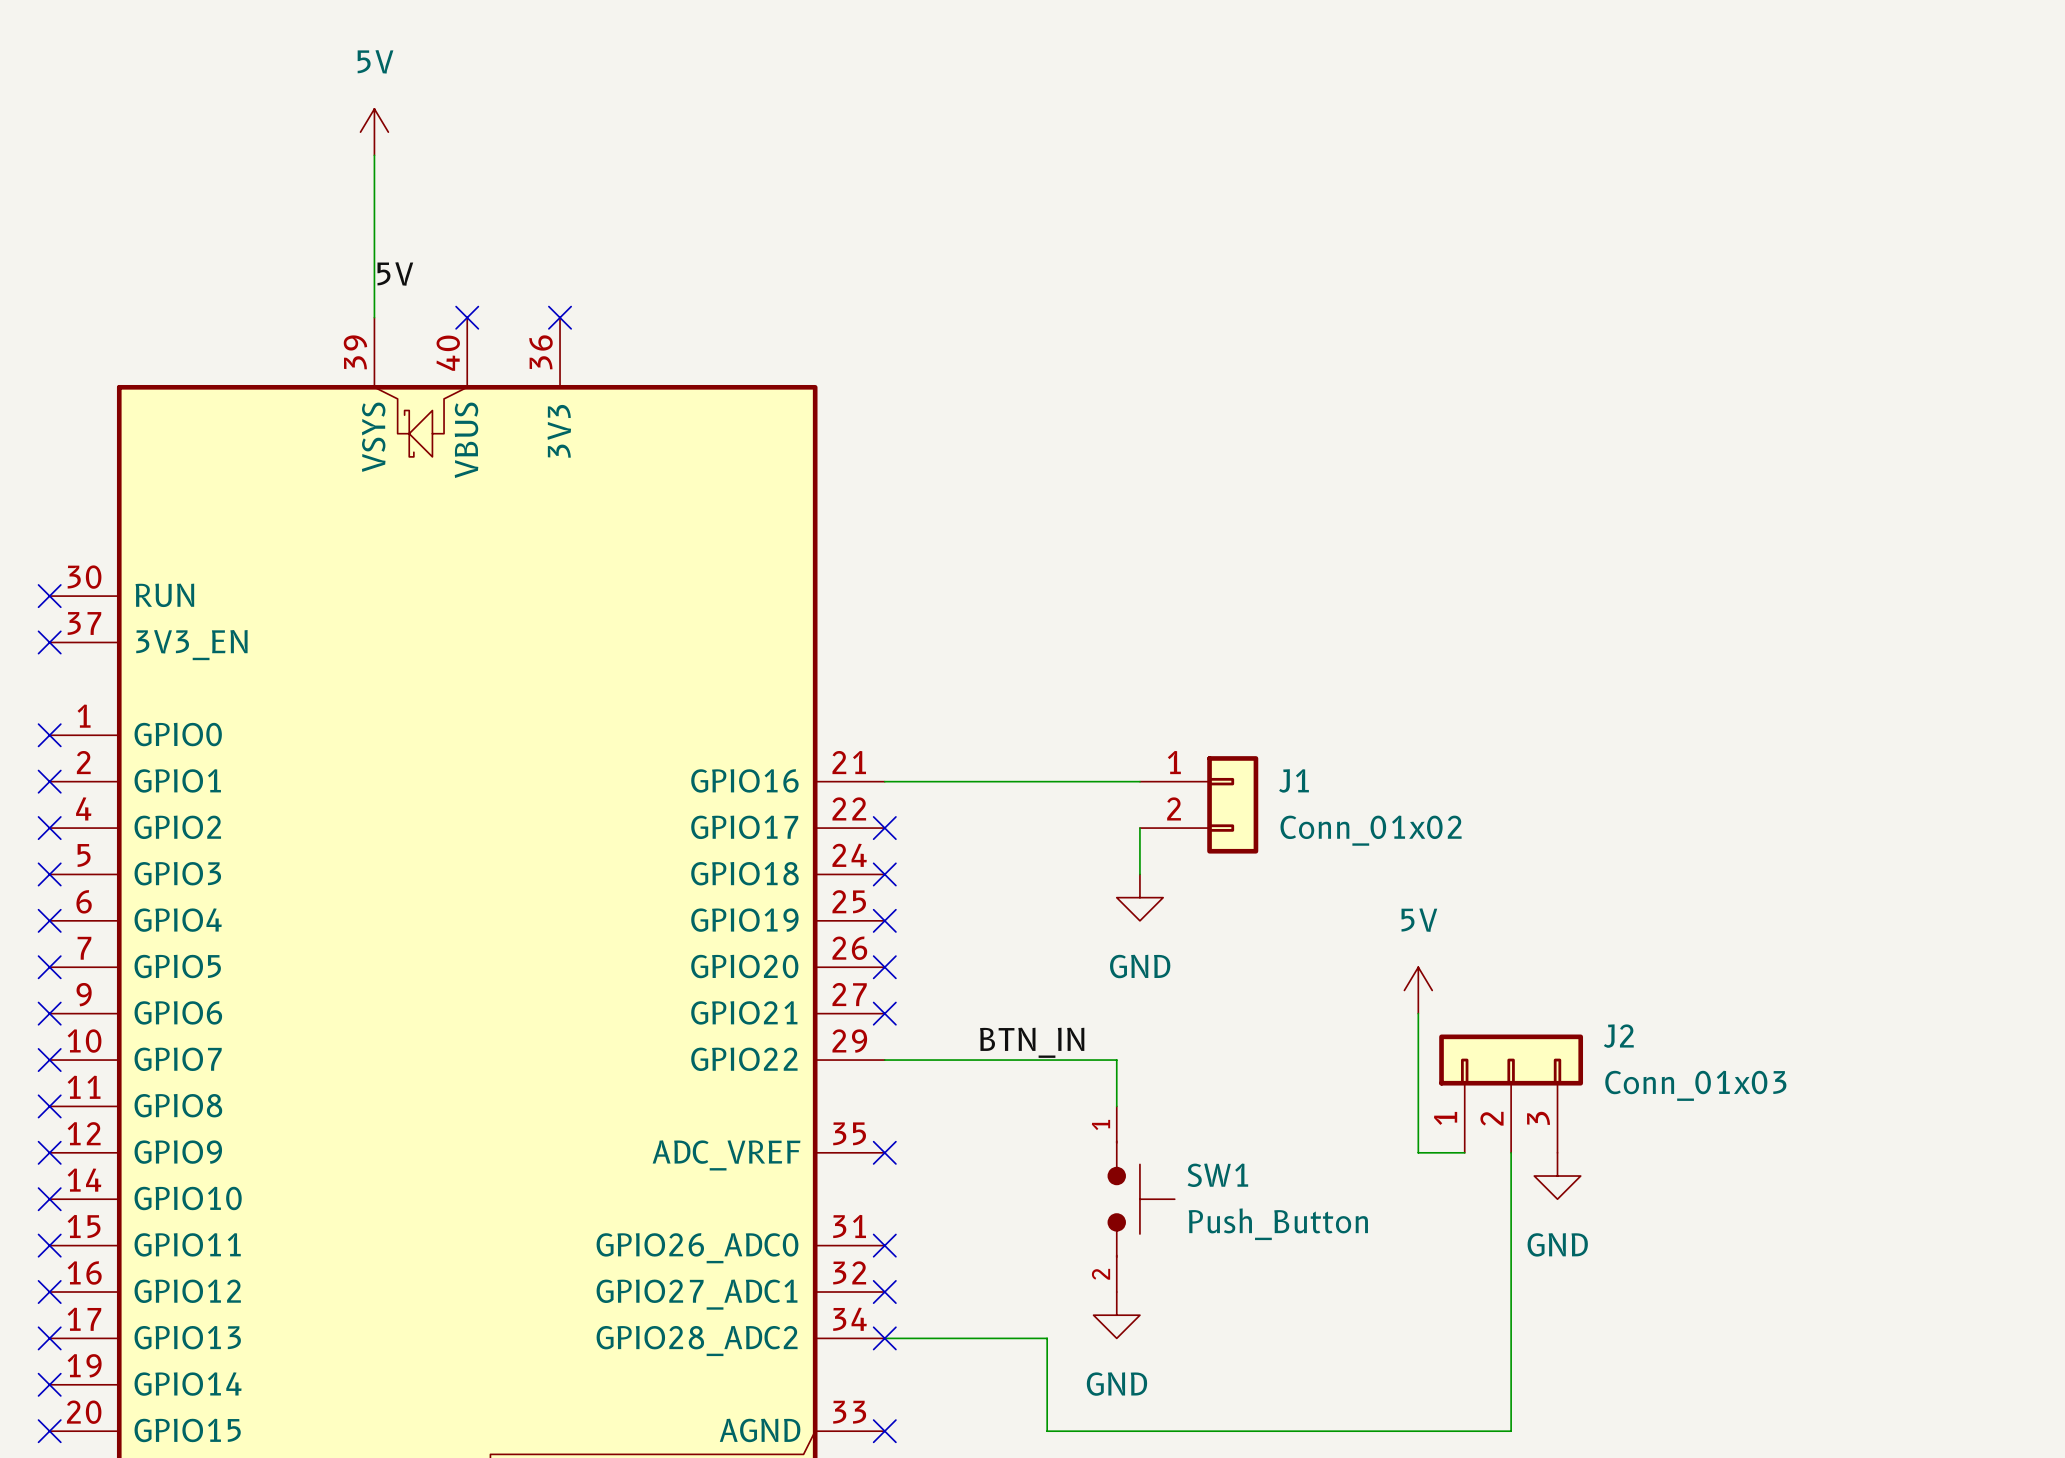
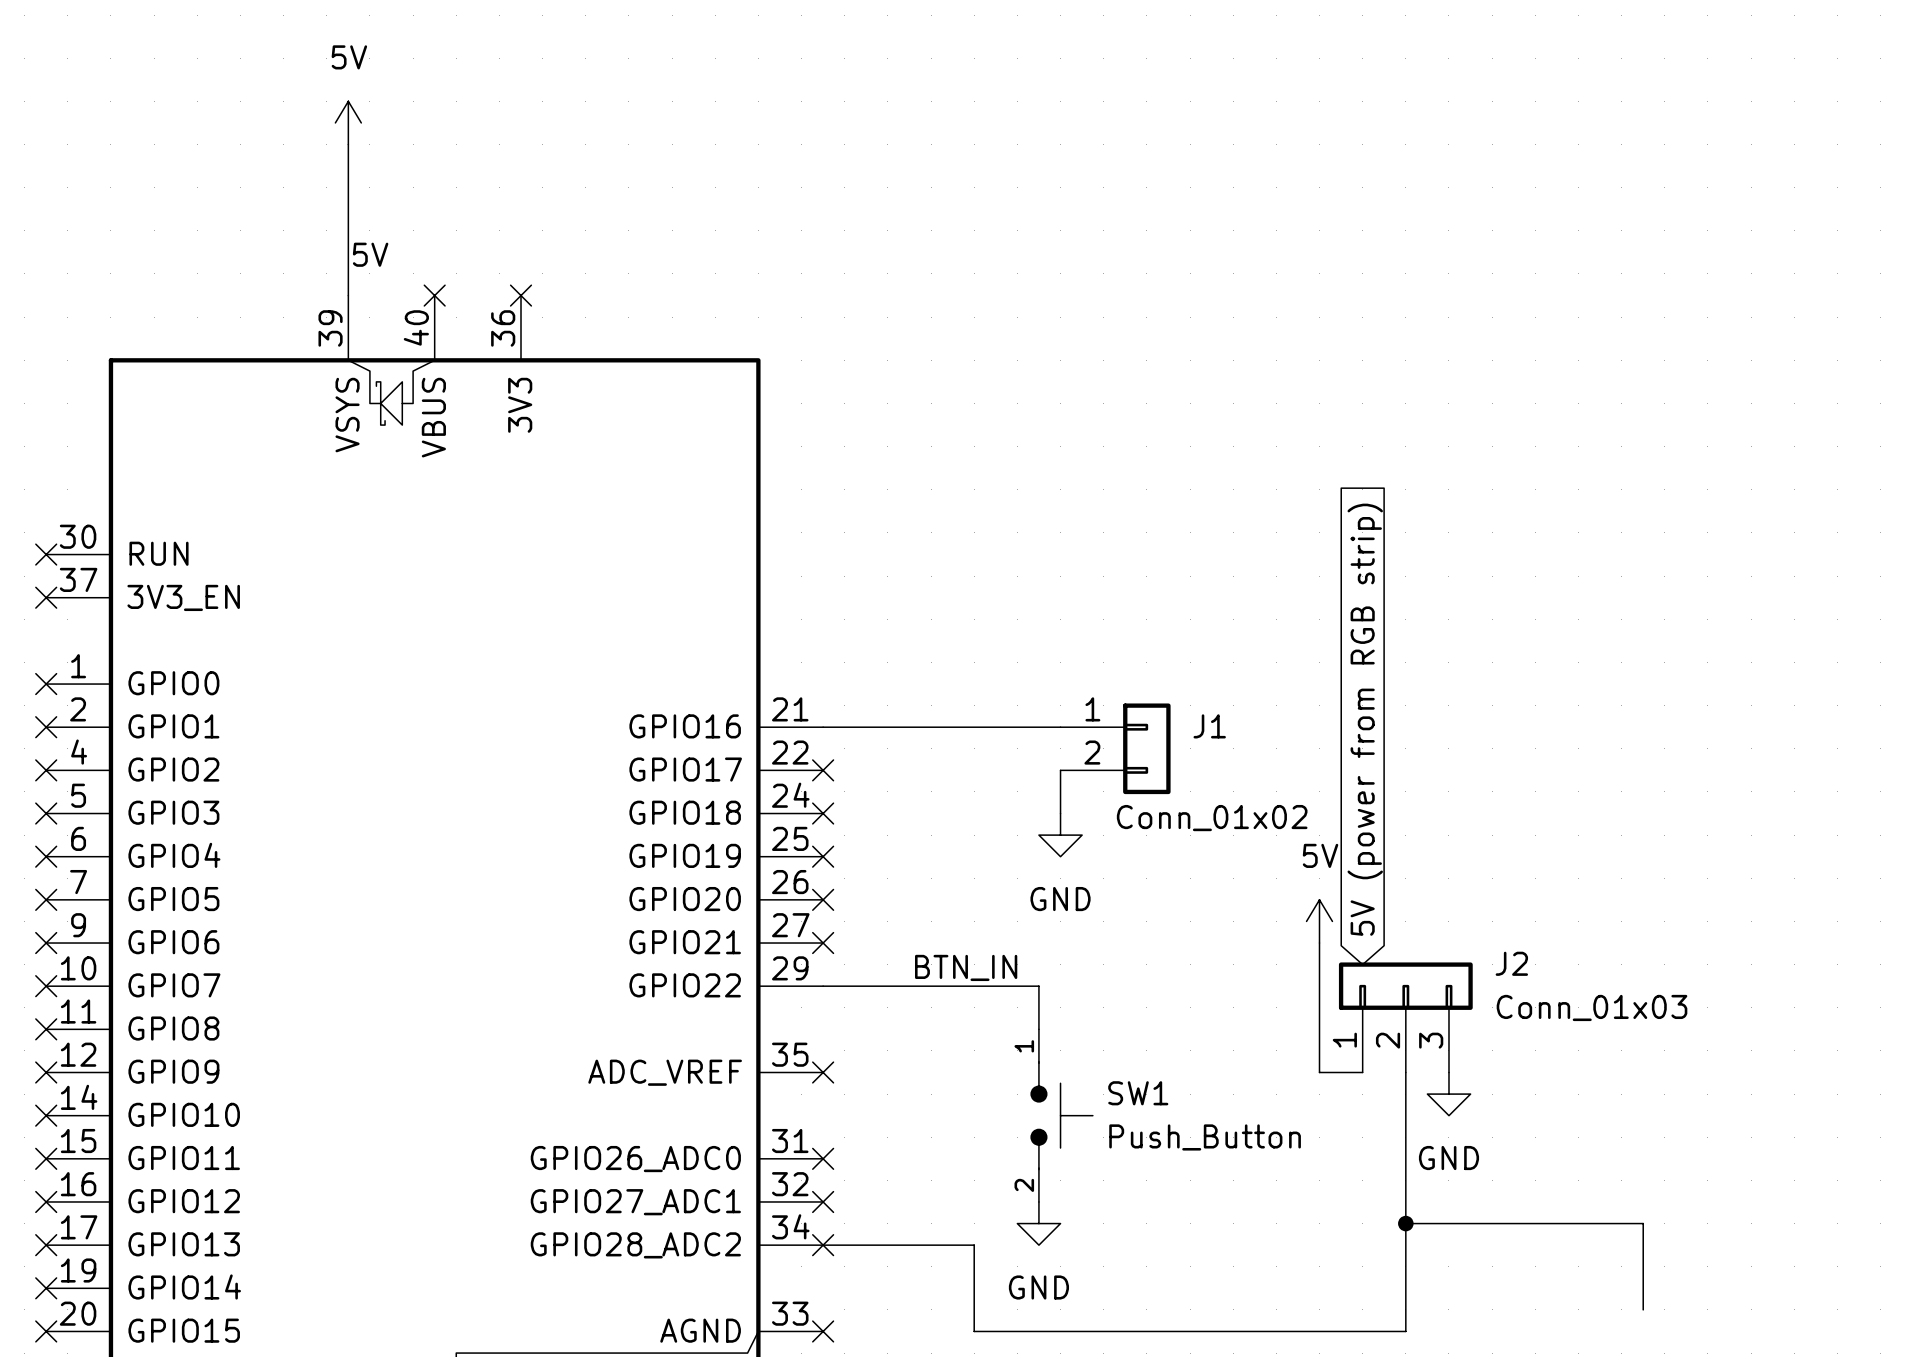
global label: none -> 5V (power from RGB strip) (1365, 719)
J1 value position: Conn_01x02 (1371, 830) -> Conn_01x02 (1212, 818)
wire: none -> (1405, 1223) (1643, 1223) (1643, 1309)
junction: none -> (1405, 1223)

